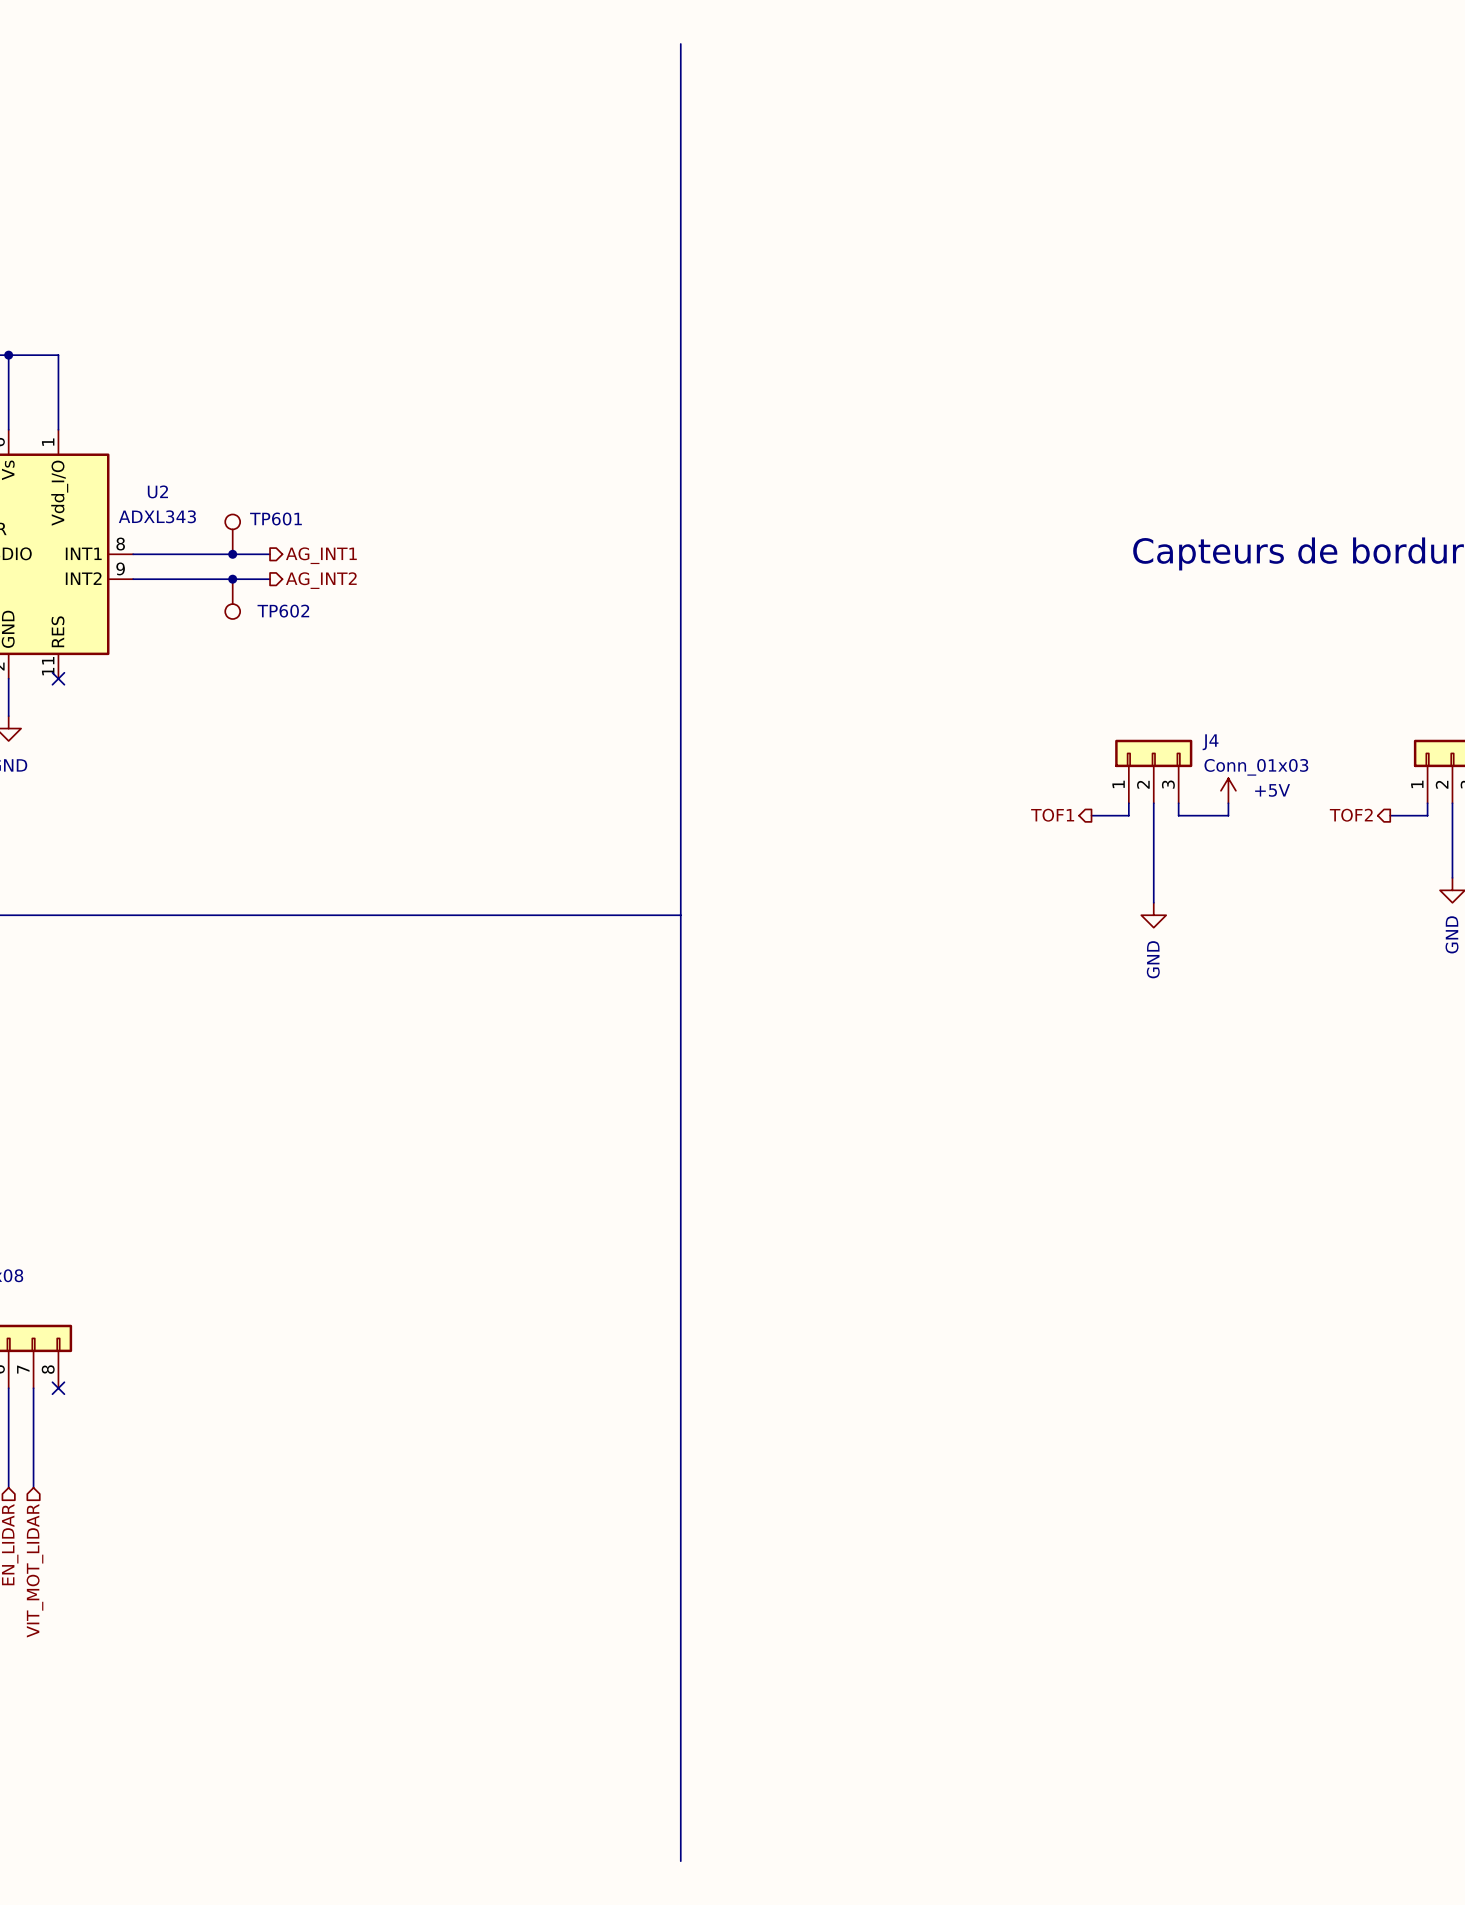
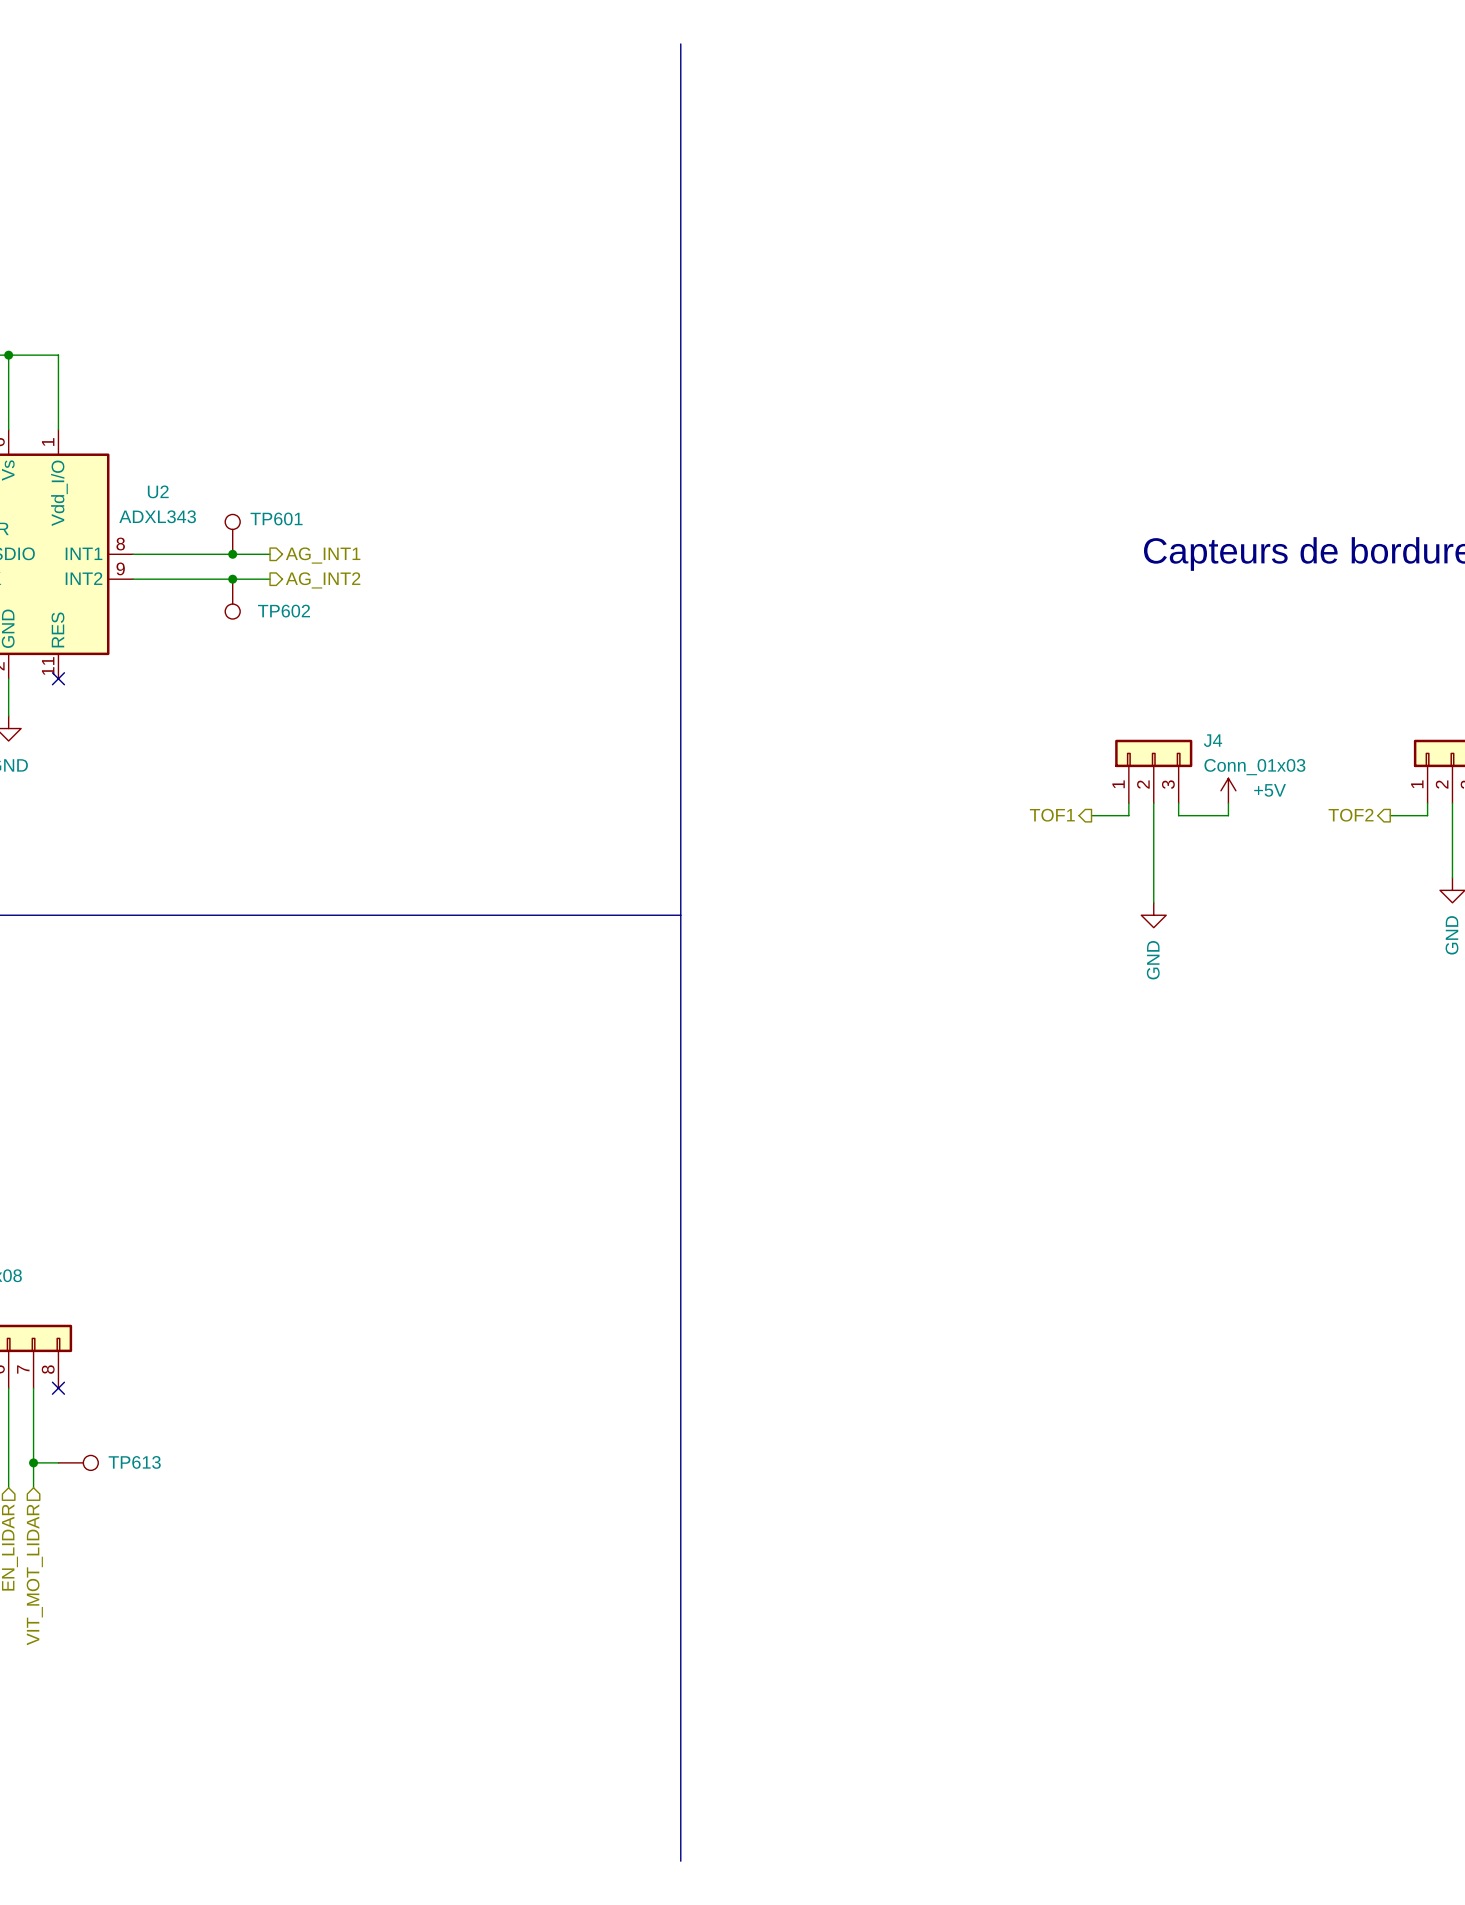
wire: none -> (33, 1462) (58, 1462)
junction: none -> (33, 1462)
TP613: none -> (78, 1462)

